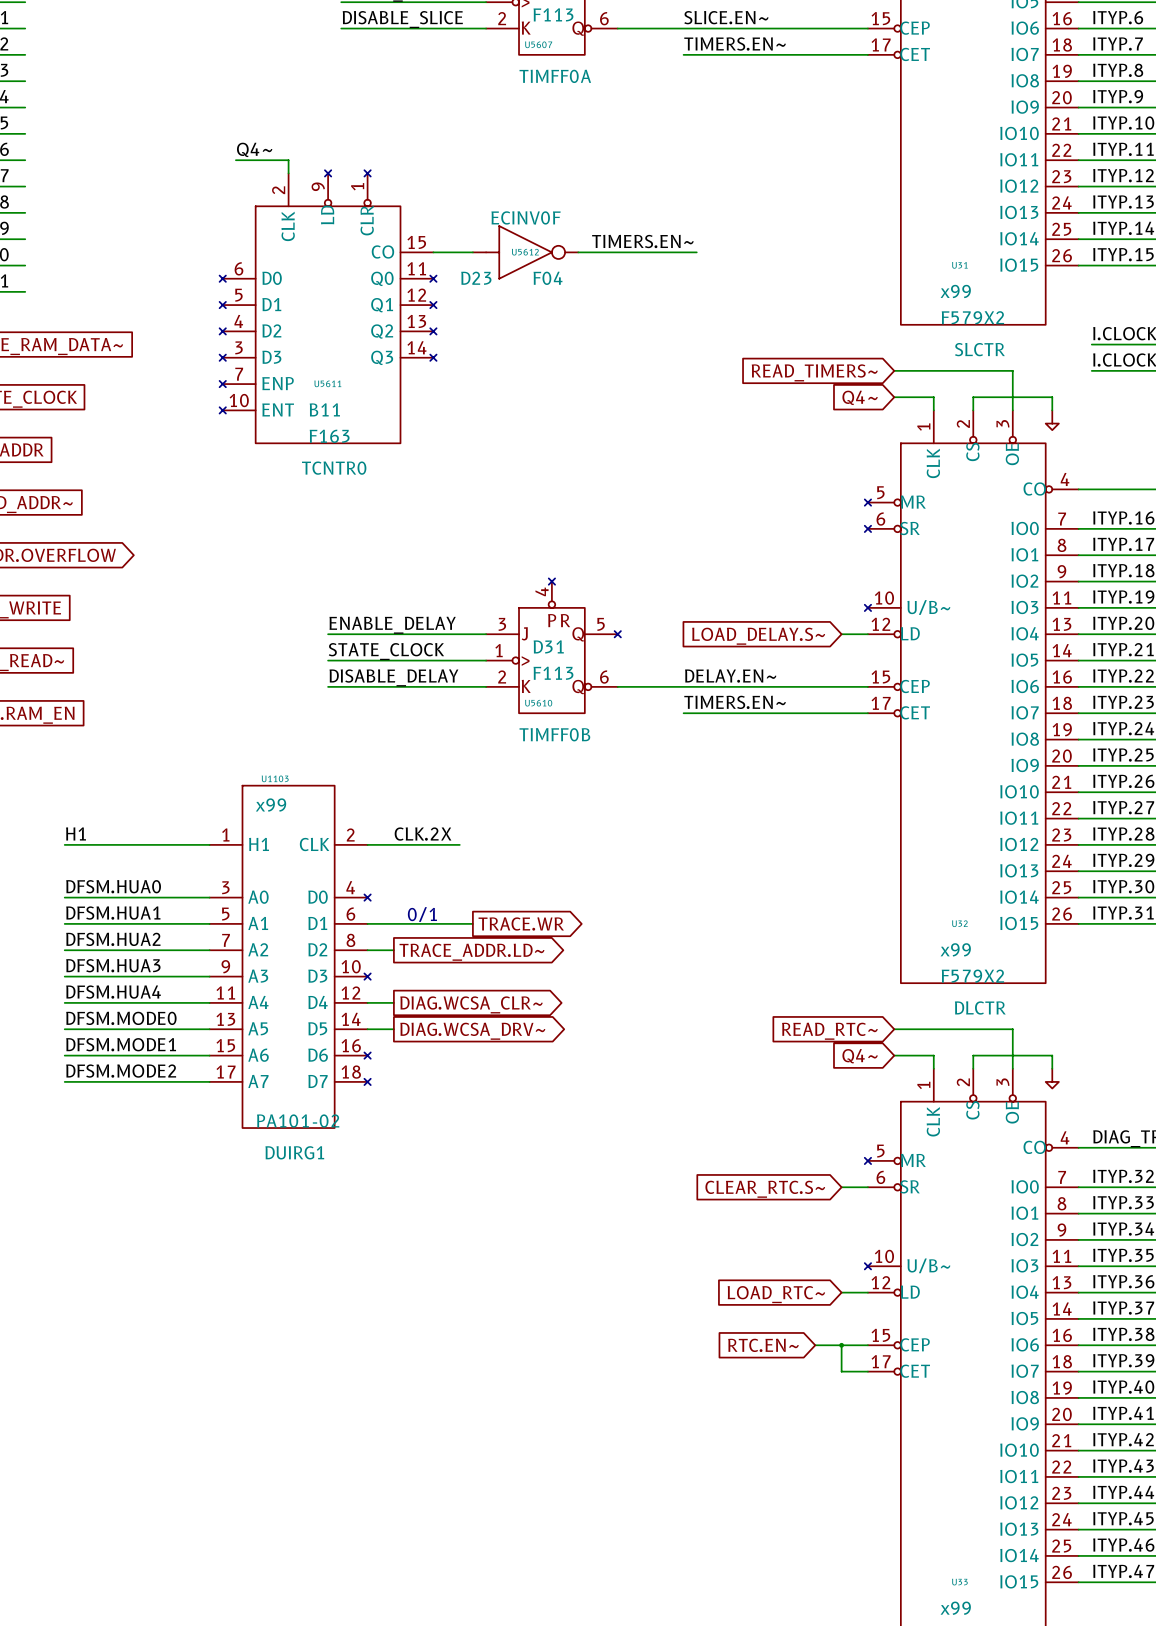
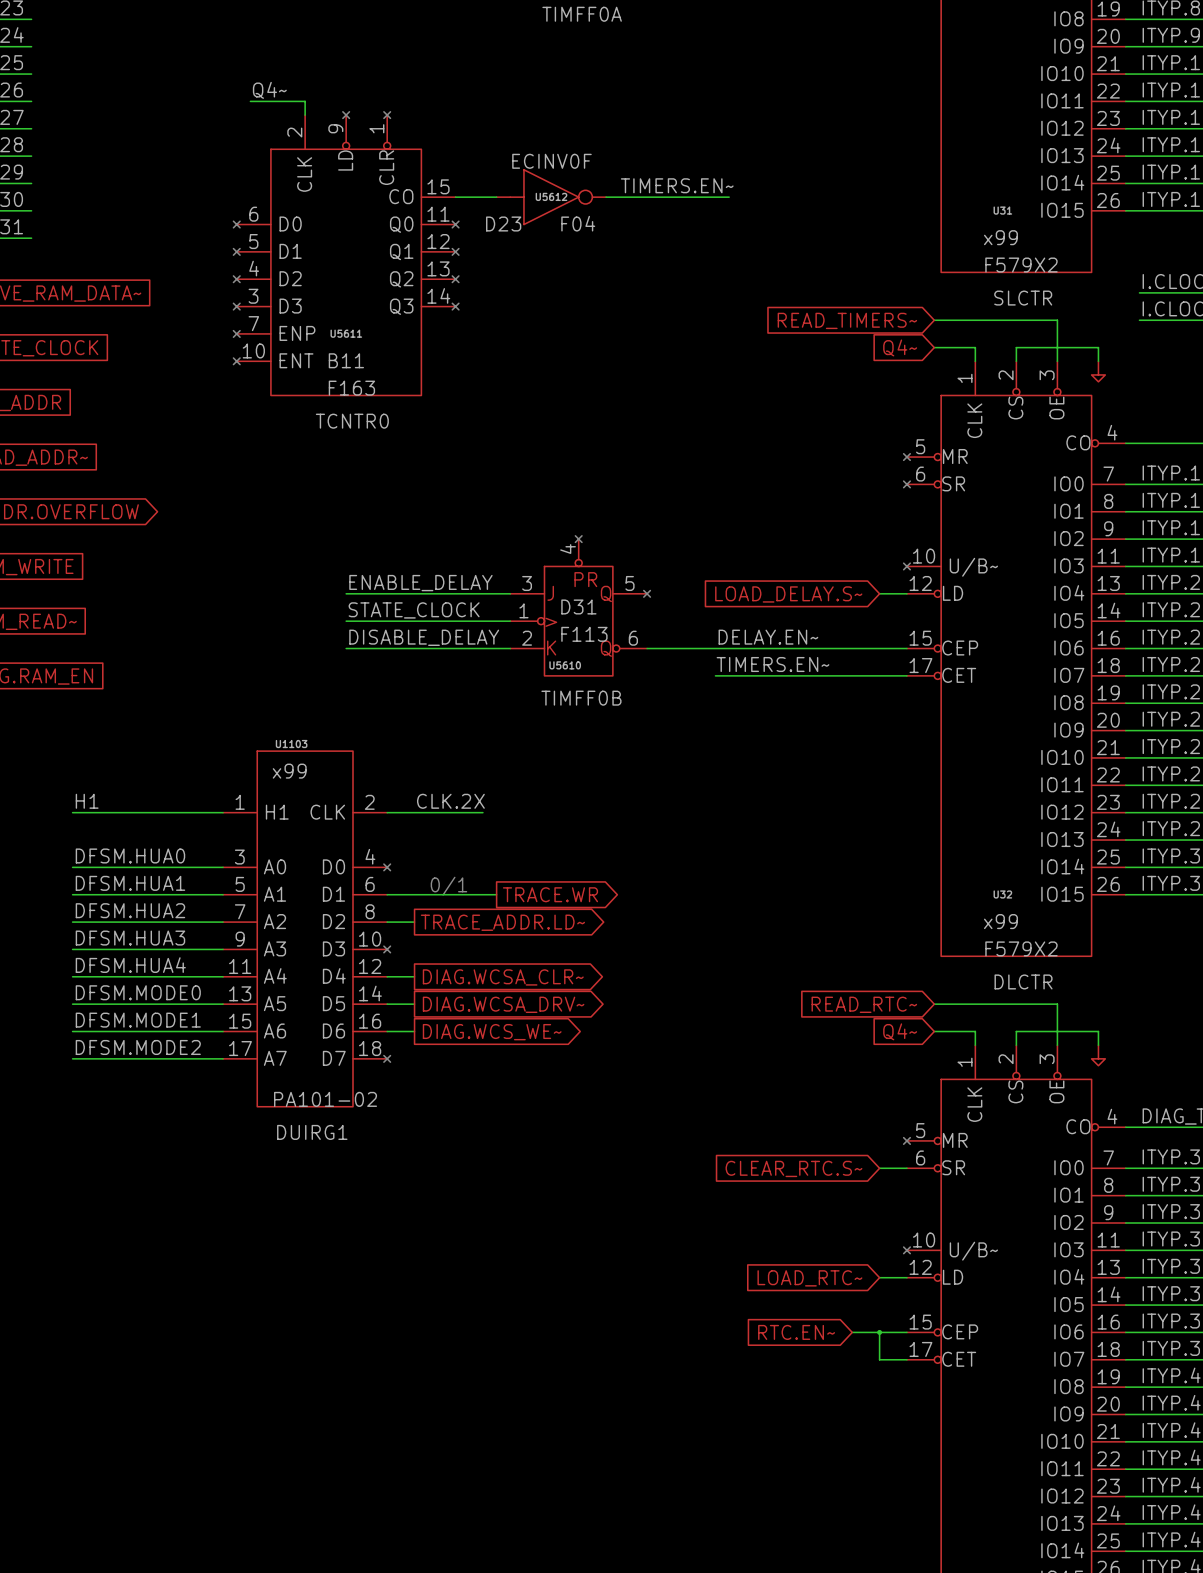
wire: none -> (387, 1031) (414, 1031)
no-connect mark: (367, 1055) -> none
global label: none -> DIAG.WCS_WE~ (492, 1032)

